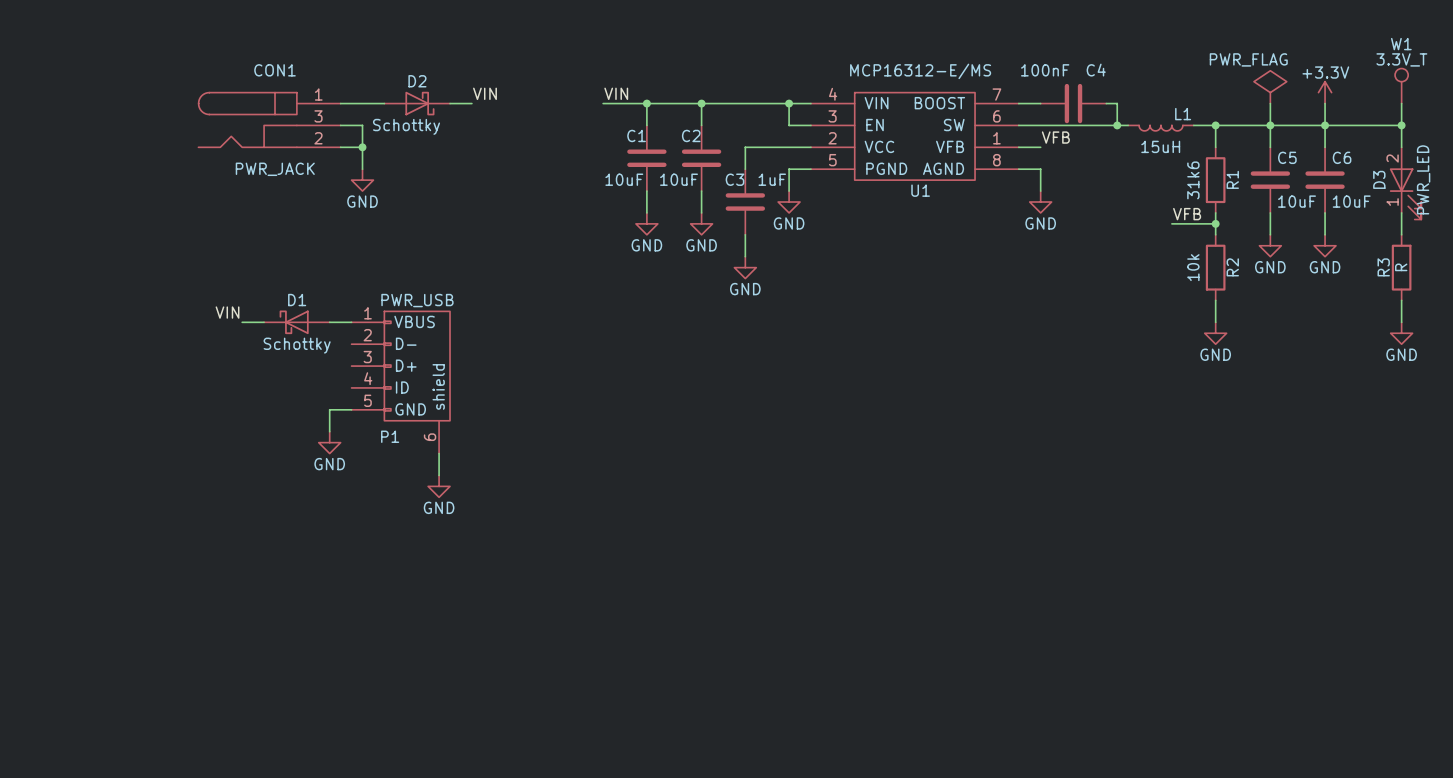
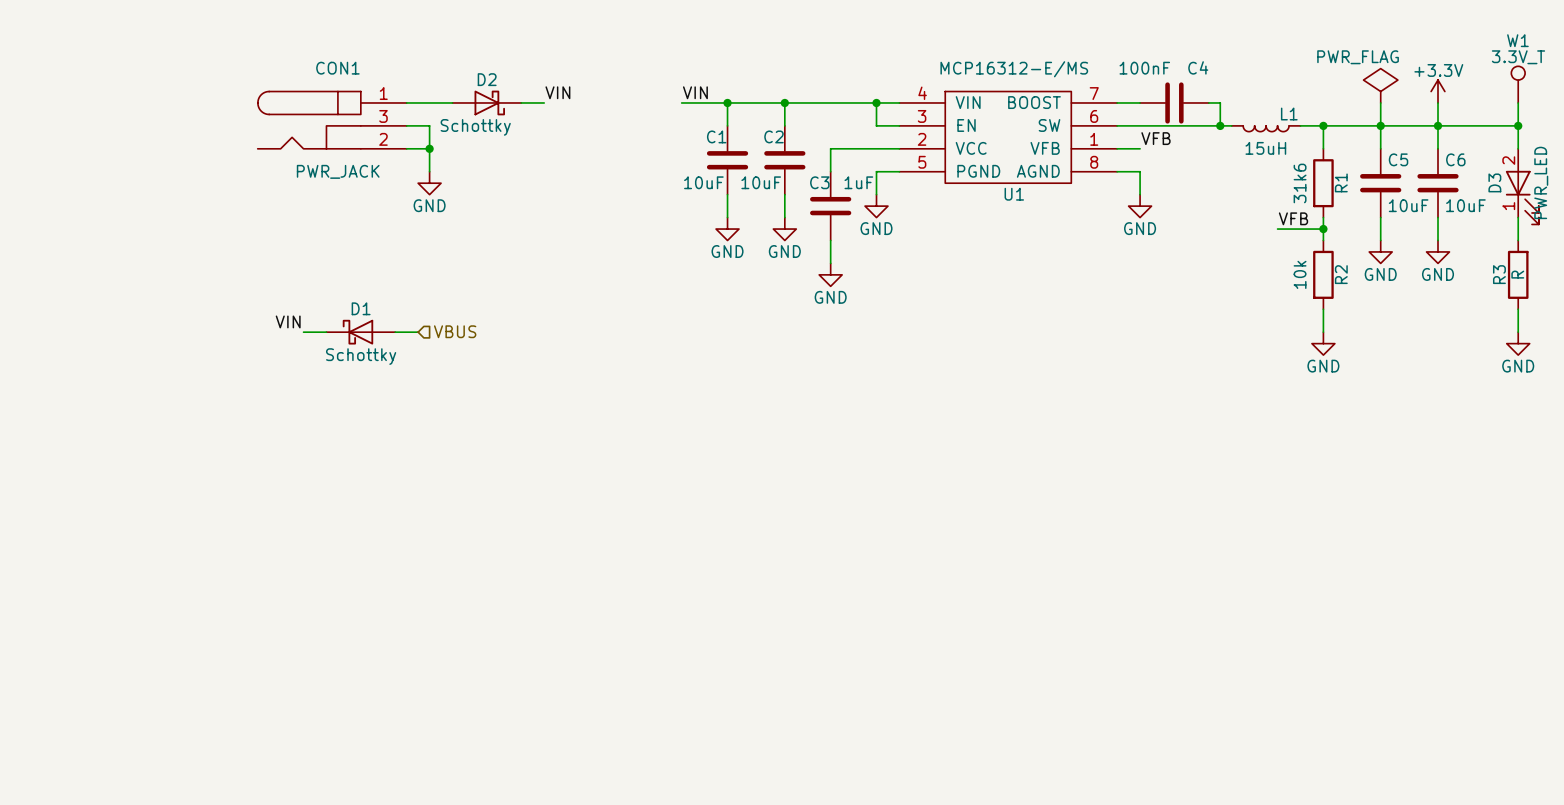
hierarchical label: none -> VBUS (455, 331)
P1: PWR_USB (400, 382) -> none
wire: (351, 409) (329, 409) (329, 431) -> none
power symbol: GND (329, 442) -> none
wire: (439, 453) (439, 475) -> none
power symbol: GND (439, 486) -> none

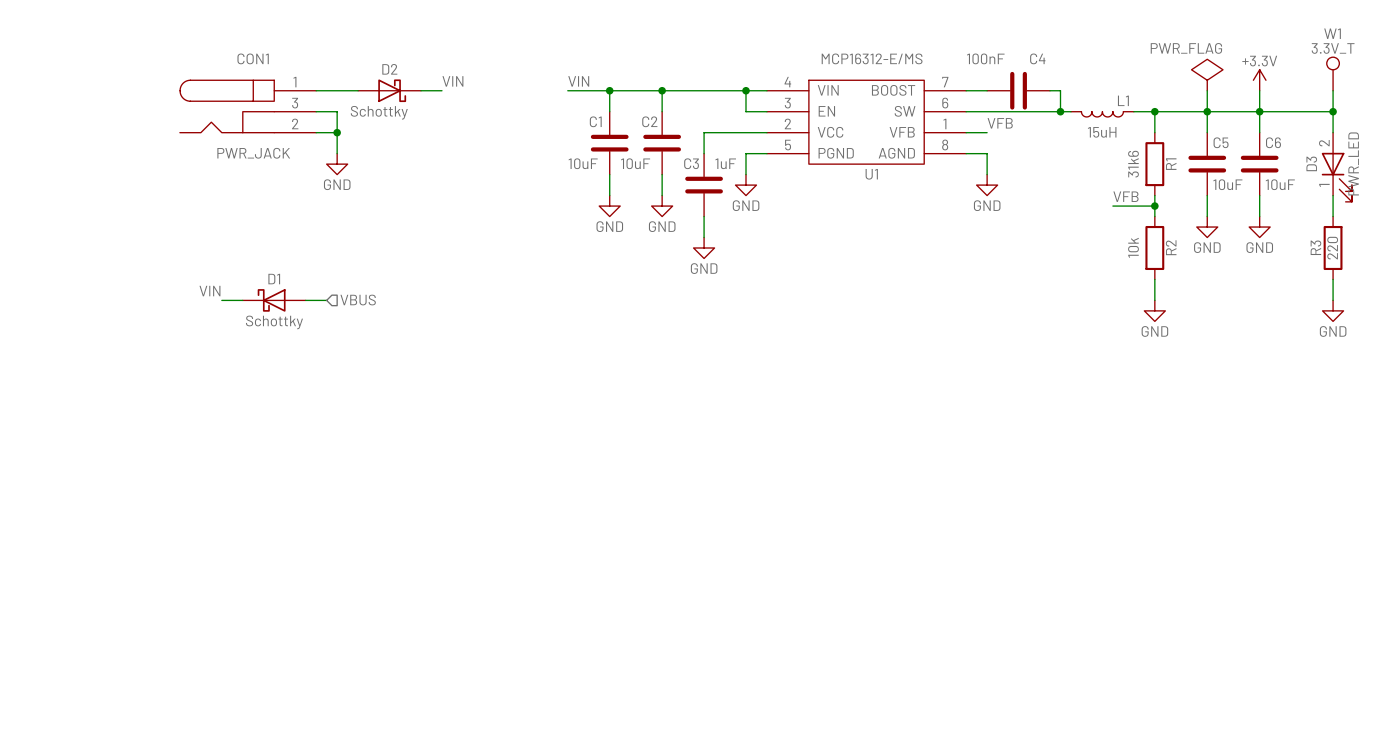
R3 value: R (1517, 274) -> 220 (1332, 248)

